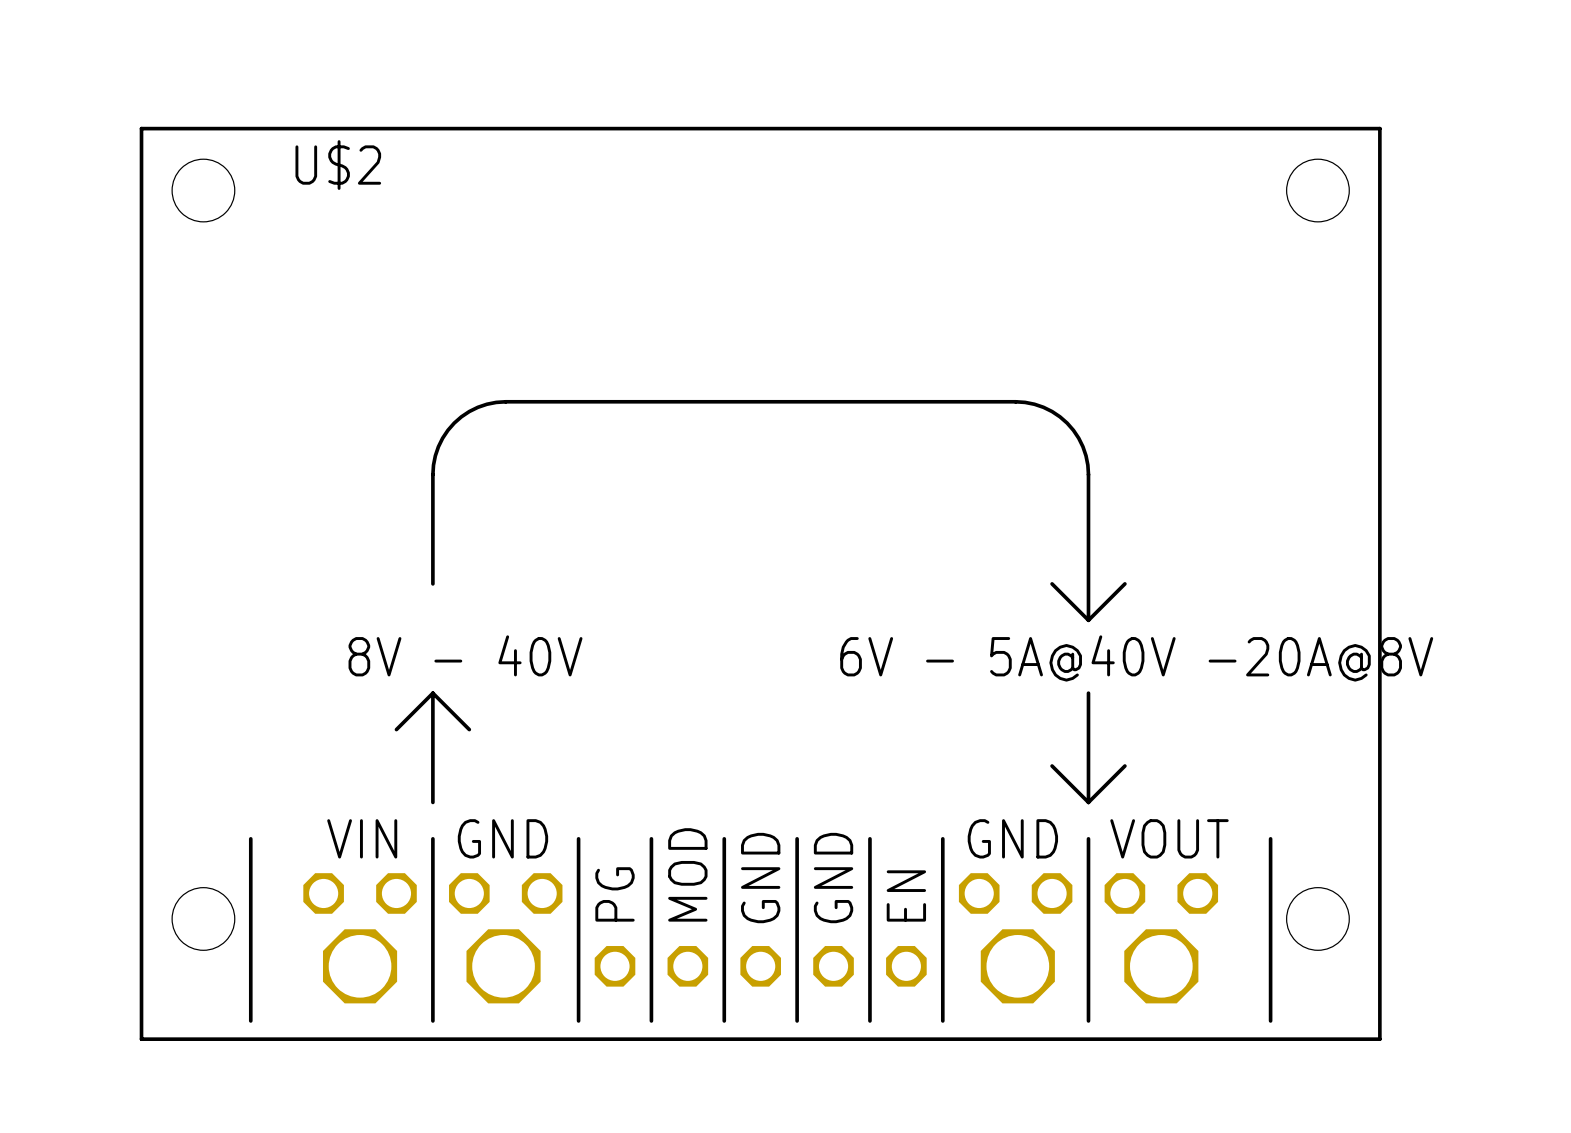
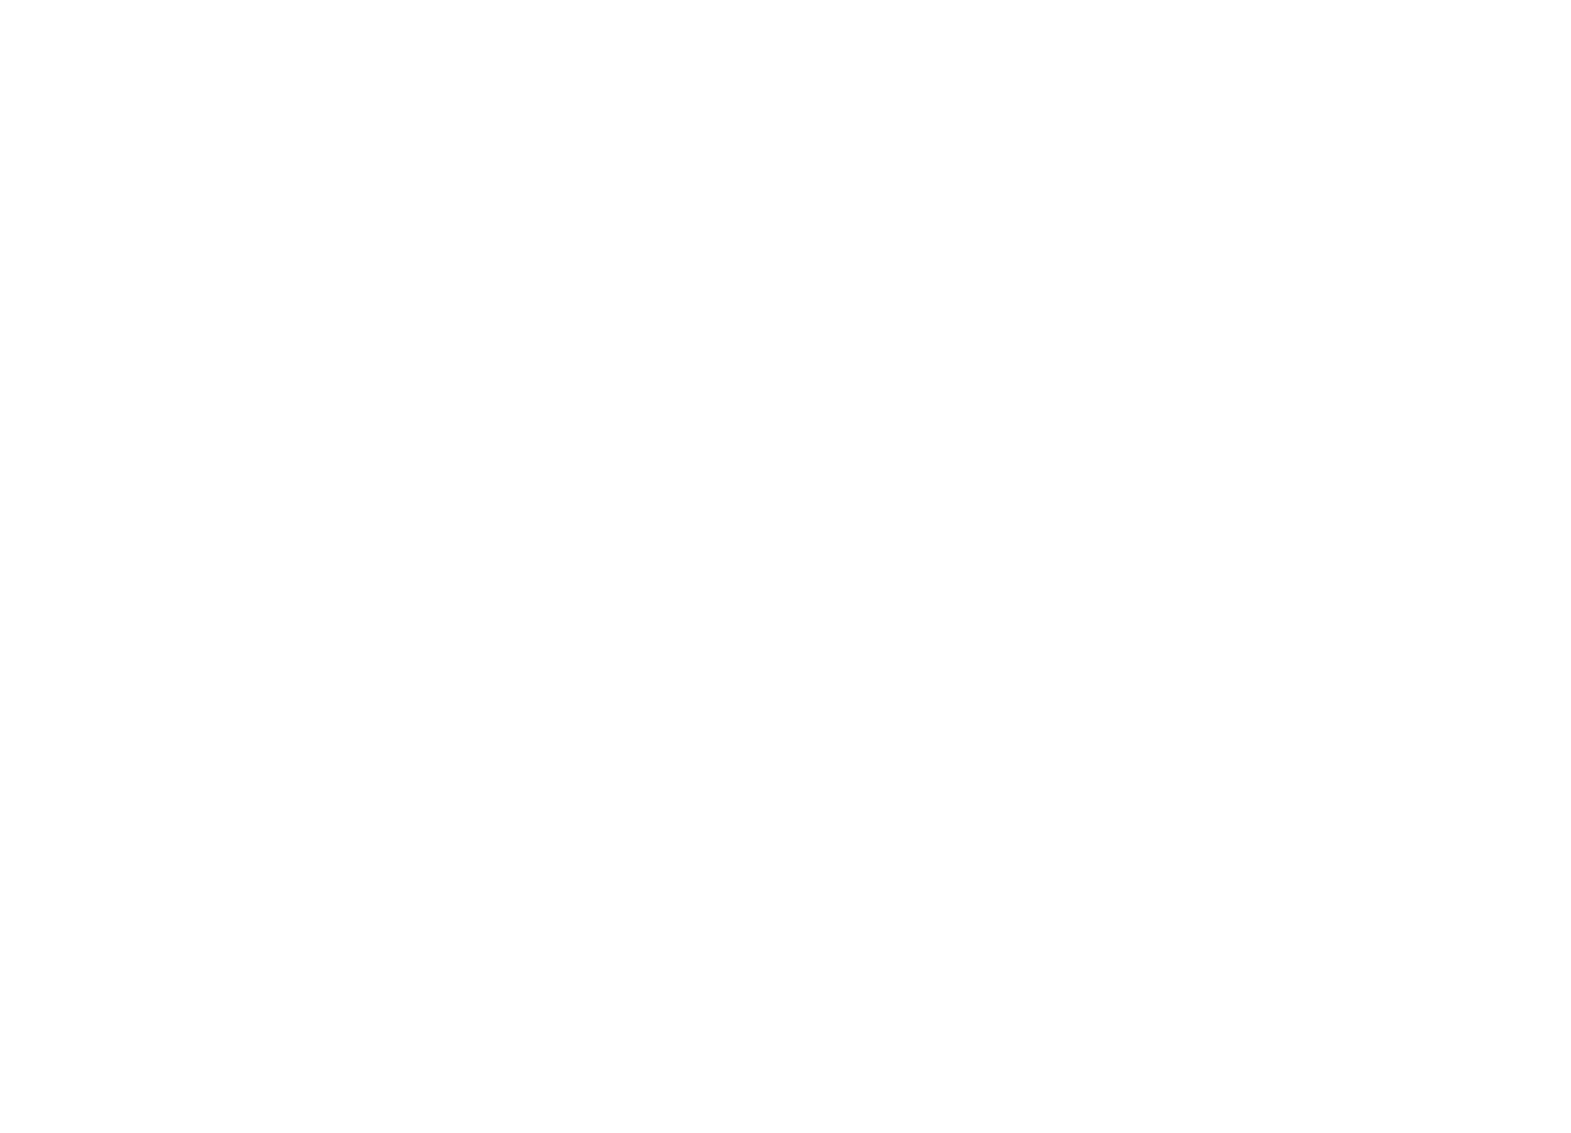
U$2: (760, 583) -> none

